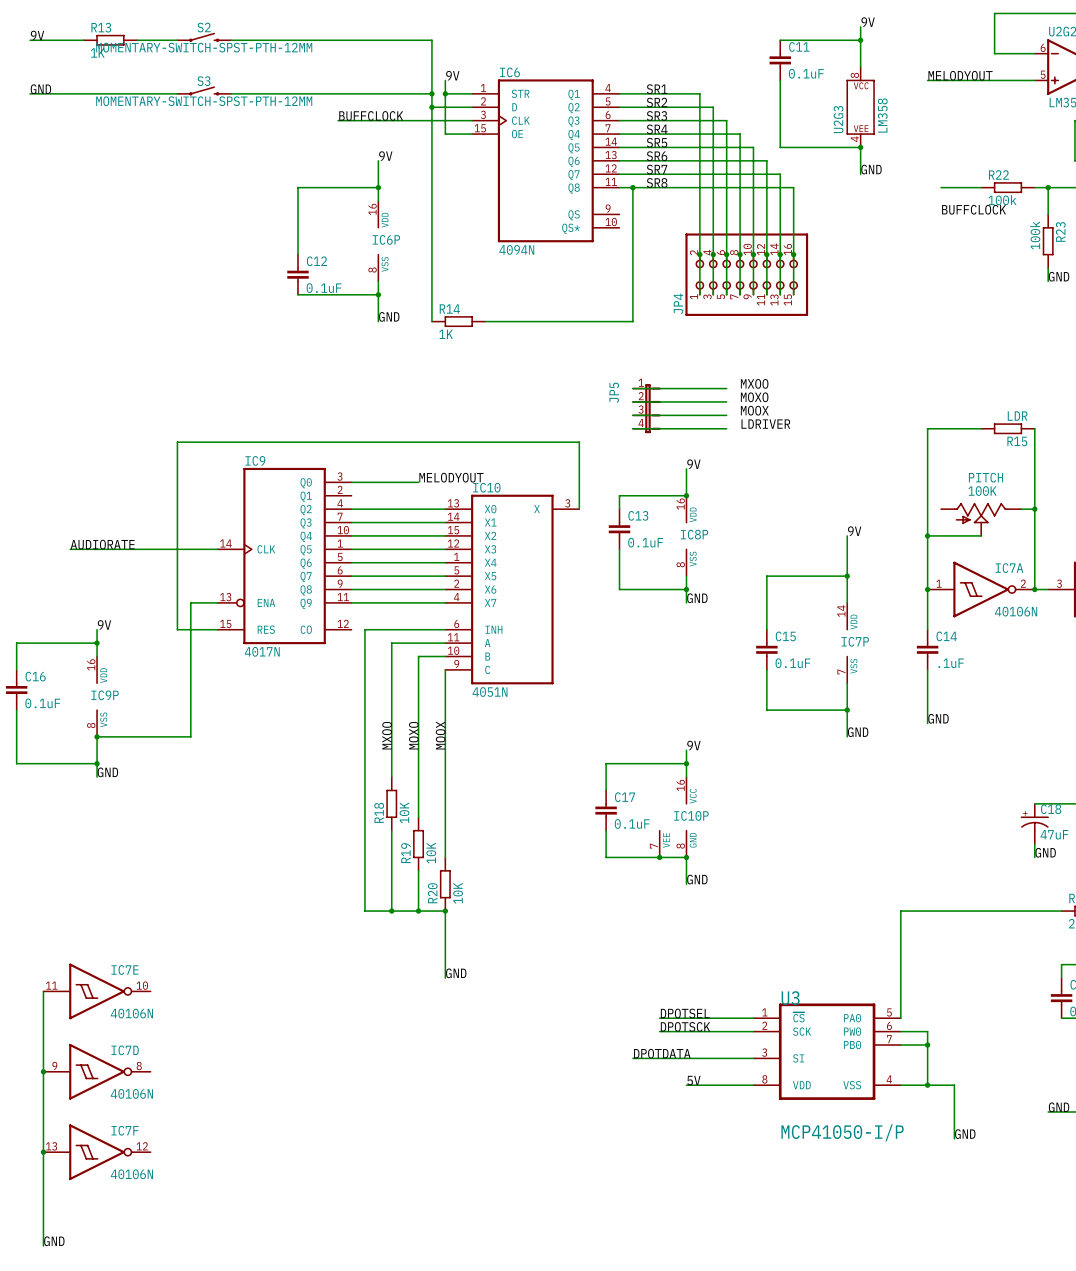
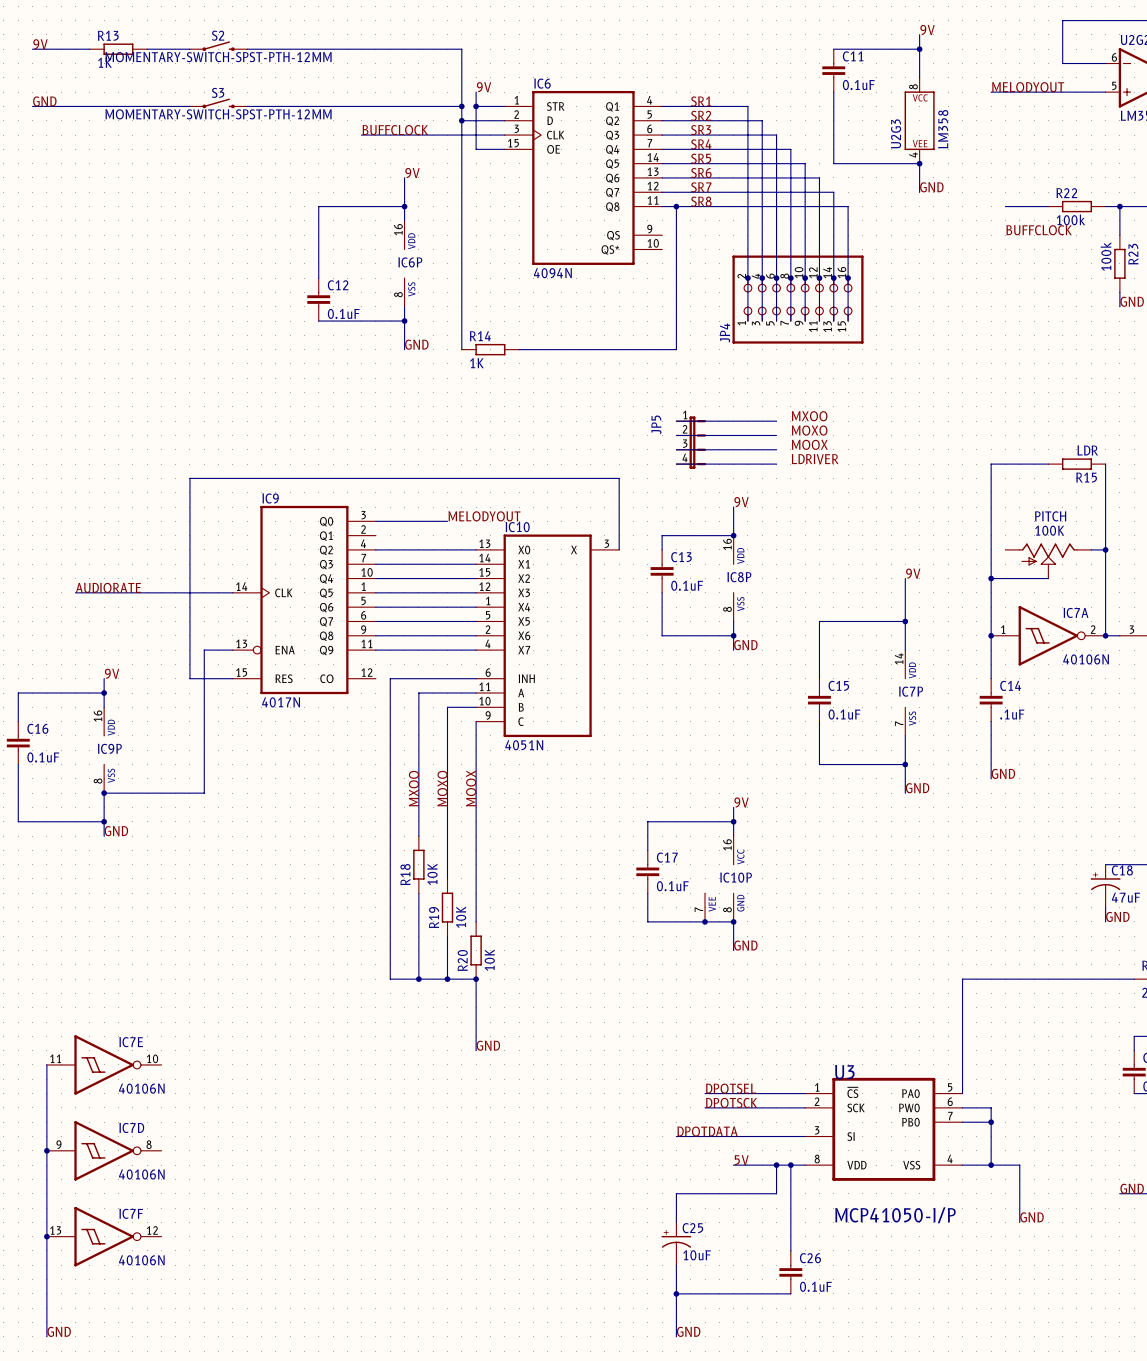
wire: none -> (776, 1165) (776, 1193) (676, 1193) (676, 1222)
junction: none -> (776, 1165)
wire: none -> (790, 1165) (790, 1250)
junction: none -> (790, 1165)
C25: none -> 10uF (676, 1243)
wire: none -> (676, 1265) (676, 1336)
C26: none -> 0.1uF (790, 1272)
wire: none -> (676, 1293) (790, 1293)
junction: none -> (676, 1293)
label: none -> GND (688, 1331)

